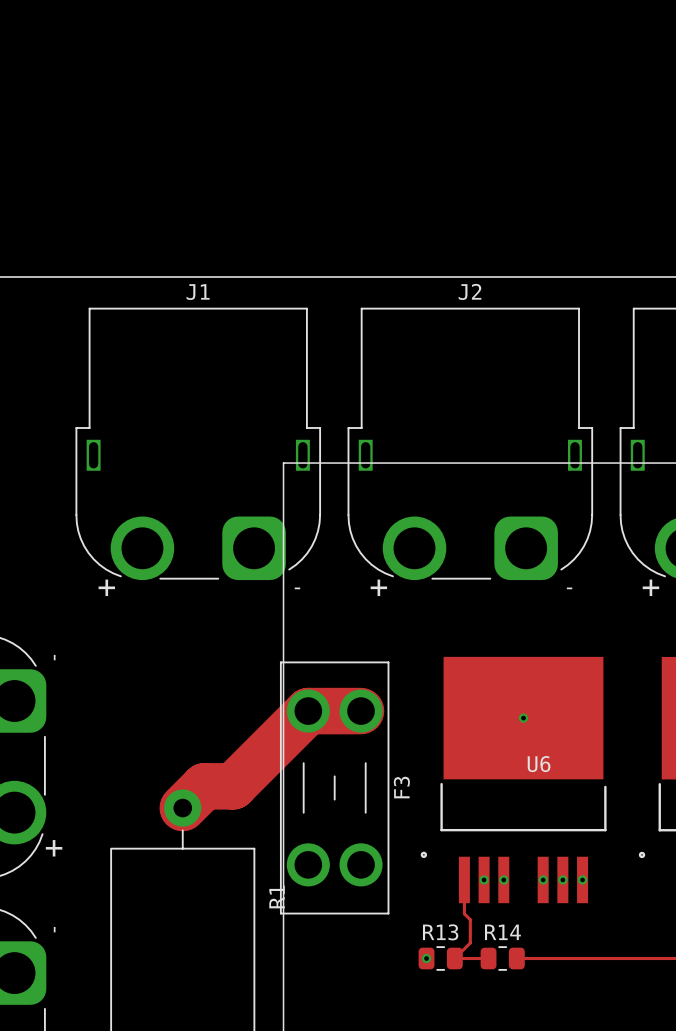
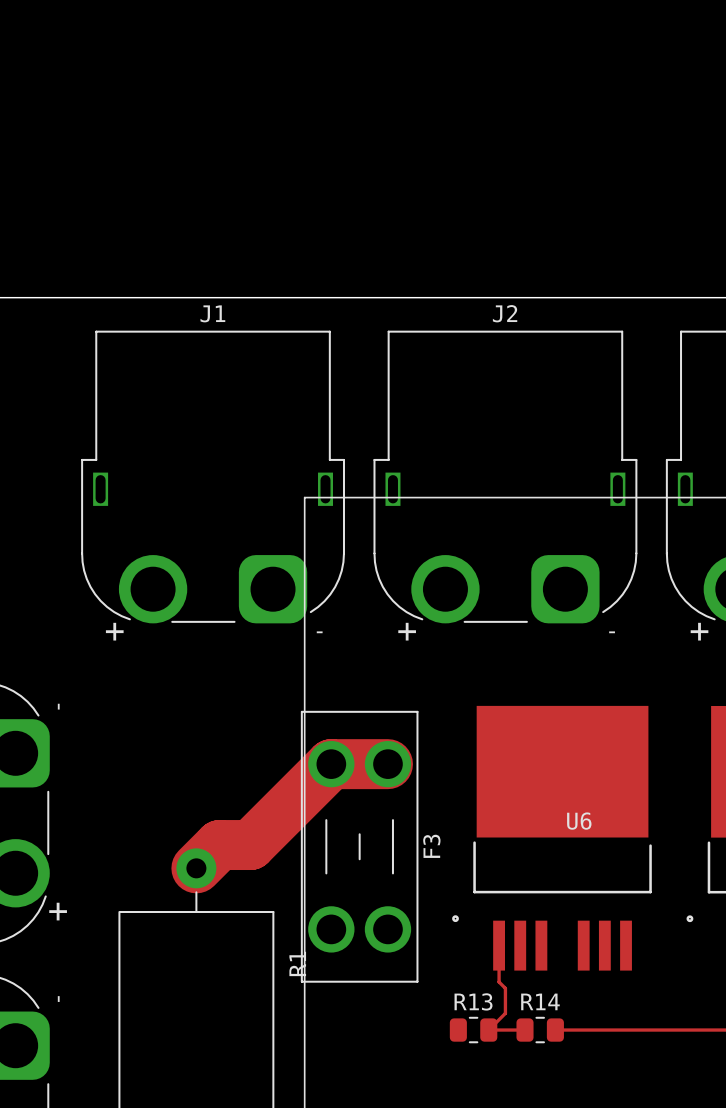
via: (523, 718) -> none
via: (484, 879) -> none
via: (503, 879) -> none
via: (543, 879) -> none
via: (562, 879) -> none
via: (582, 879) -> none
via: (426, 958) -> none

